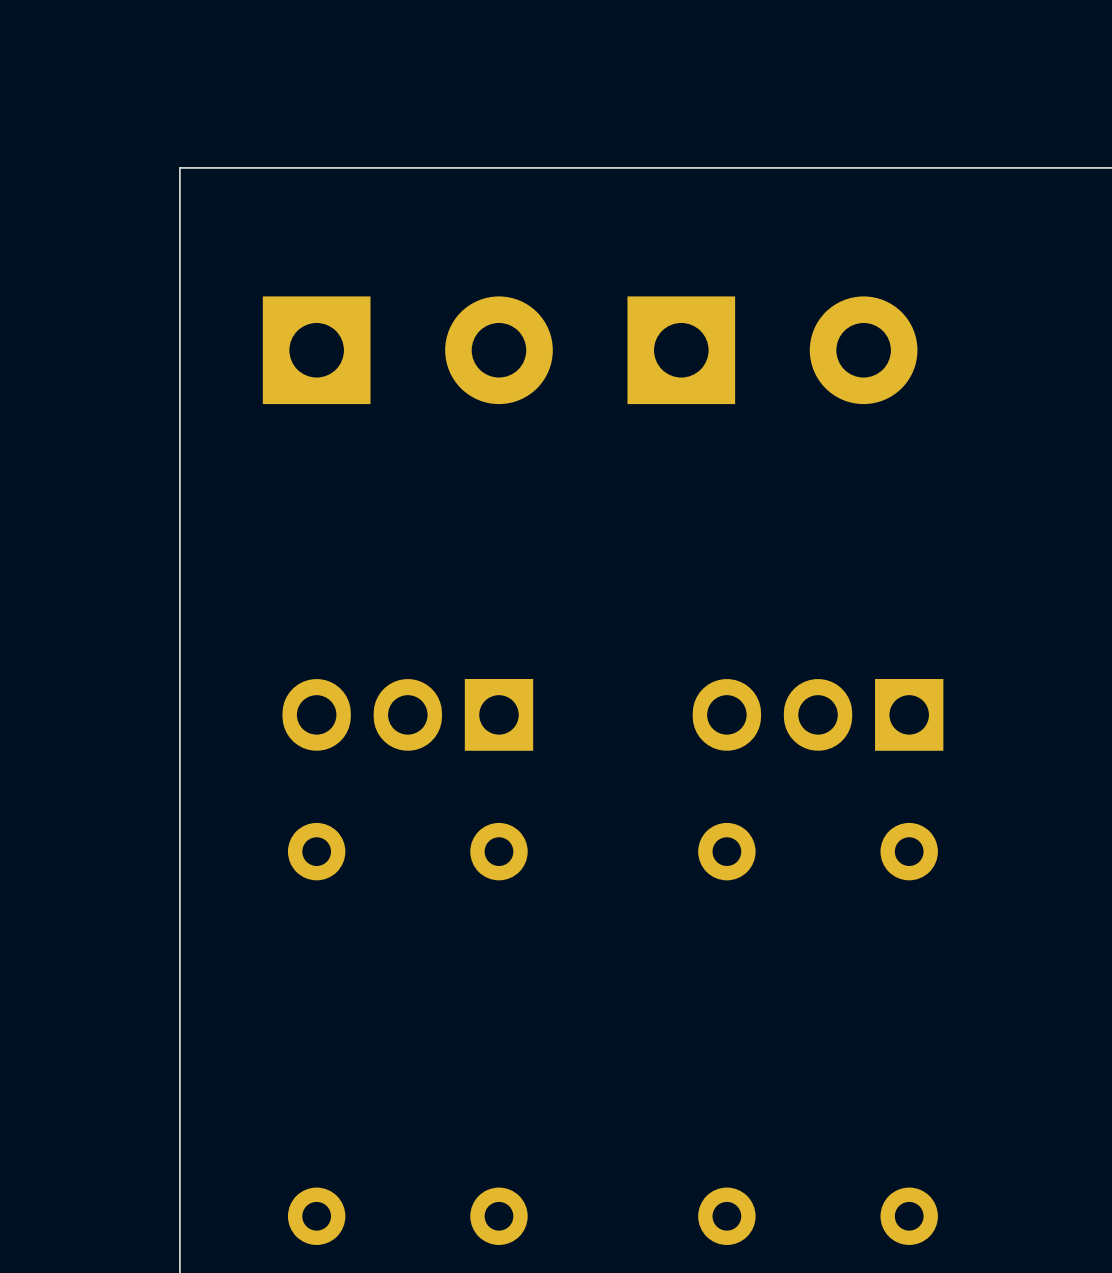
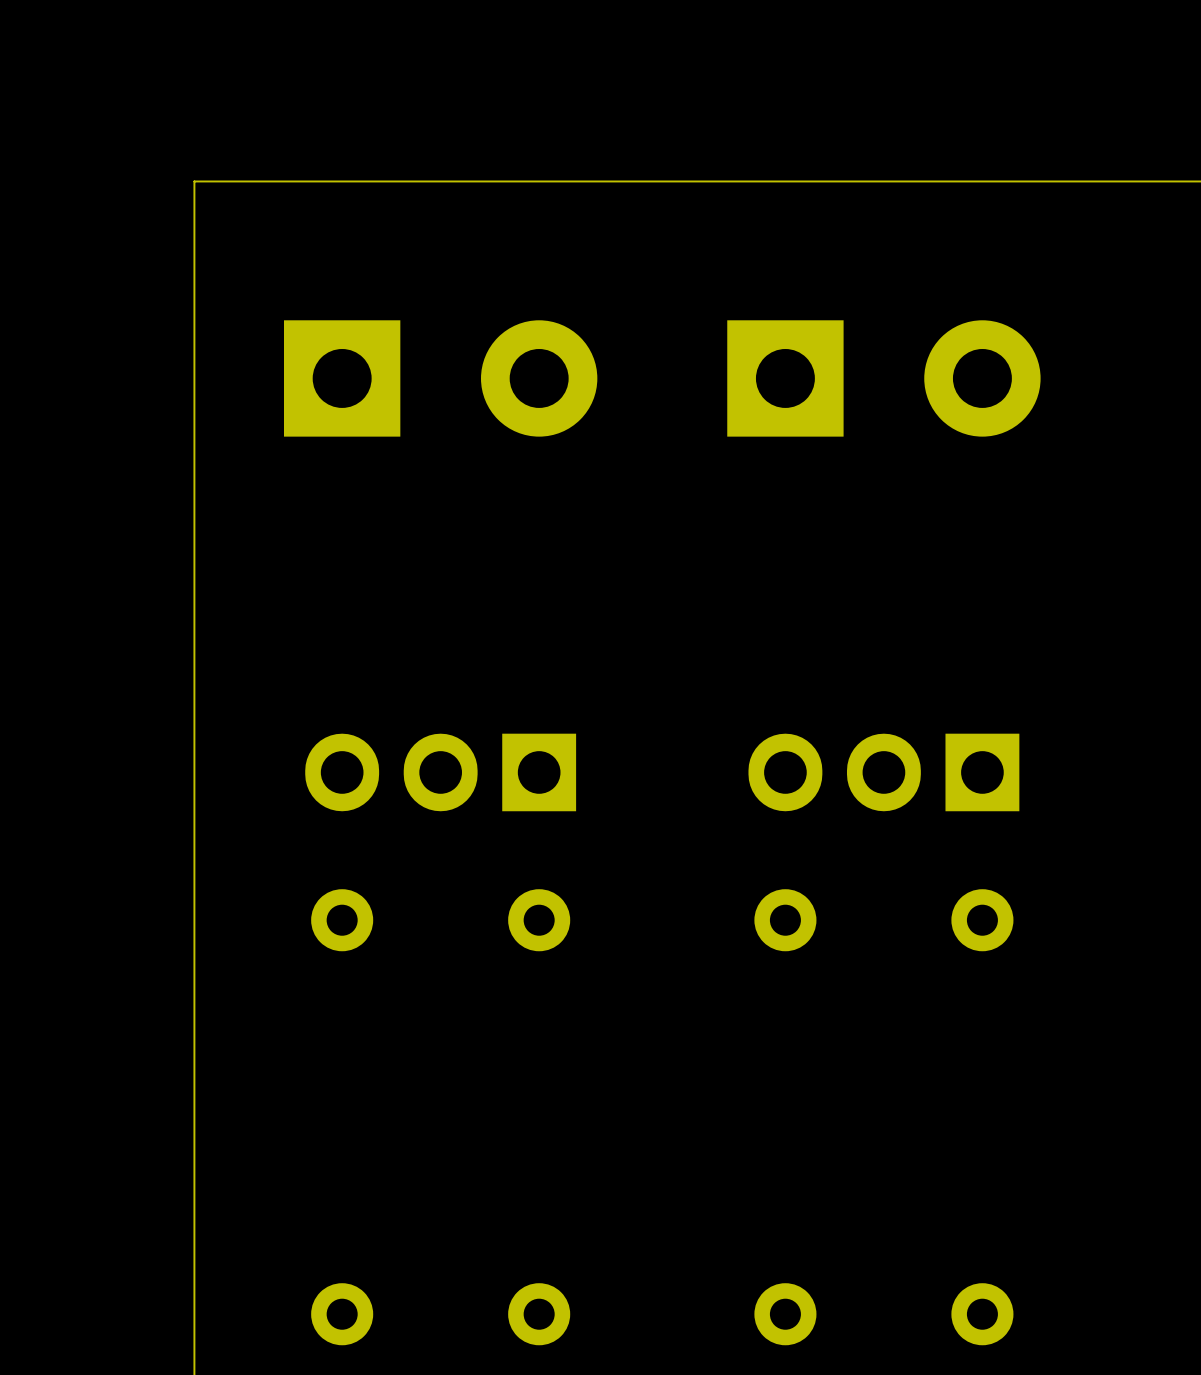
part position: (772, 350) -> (883, 378)

